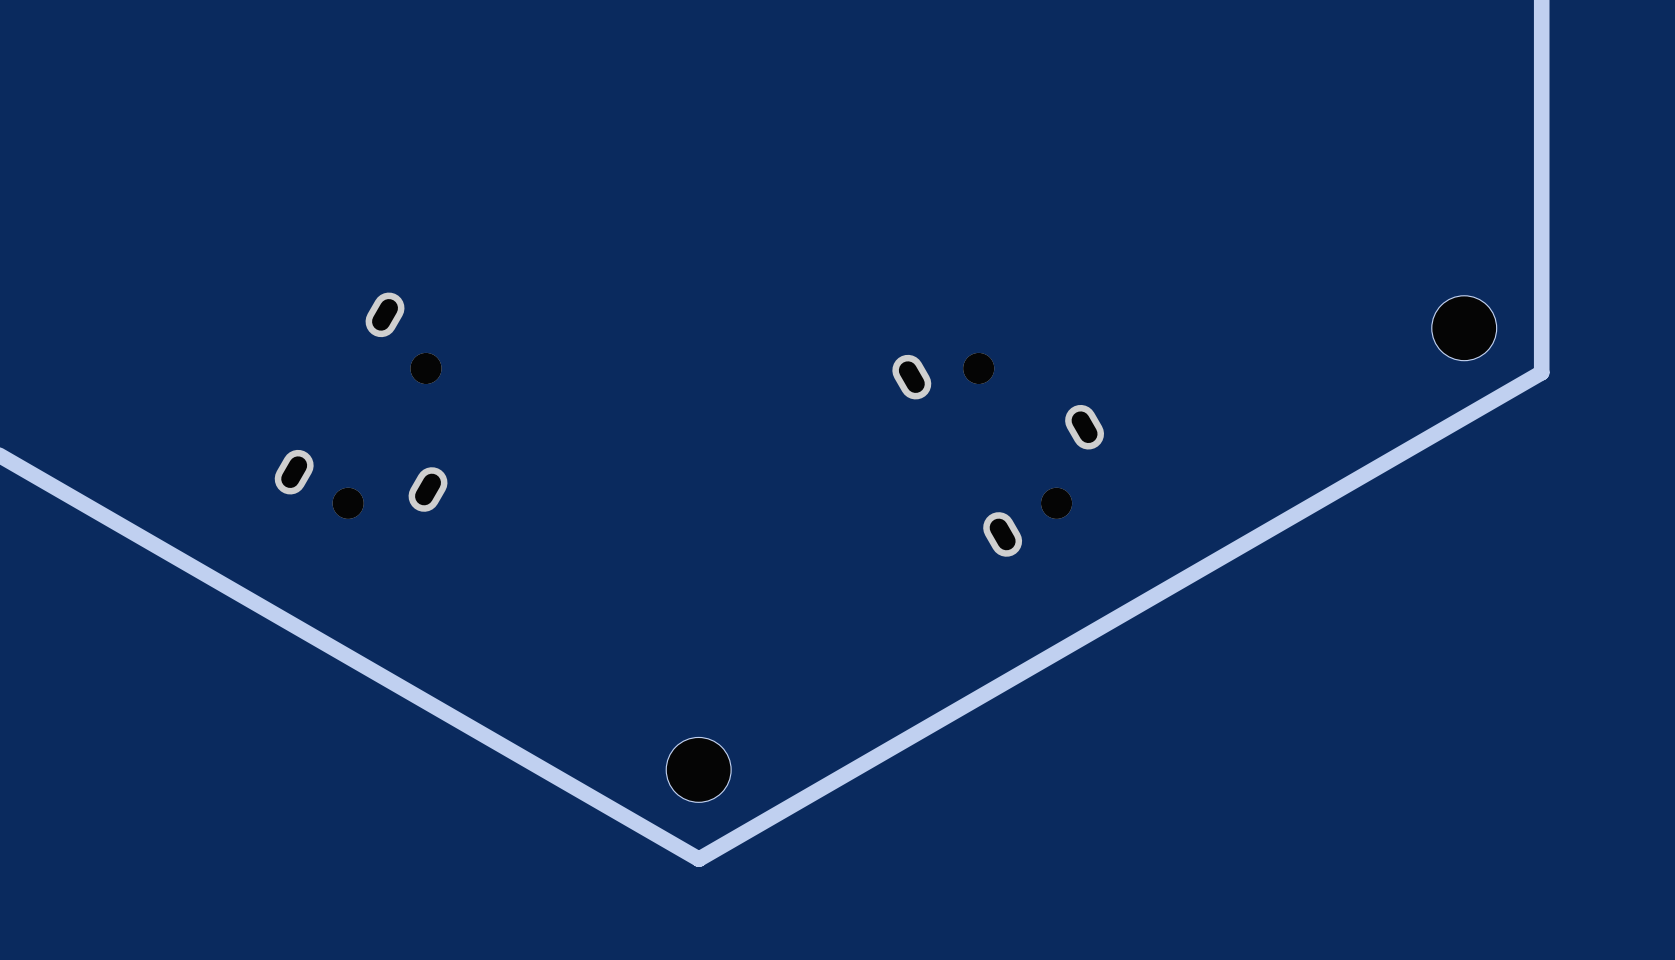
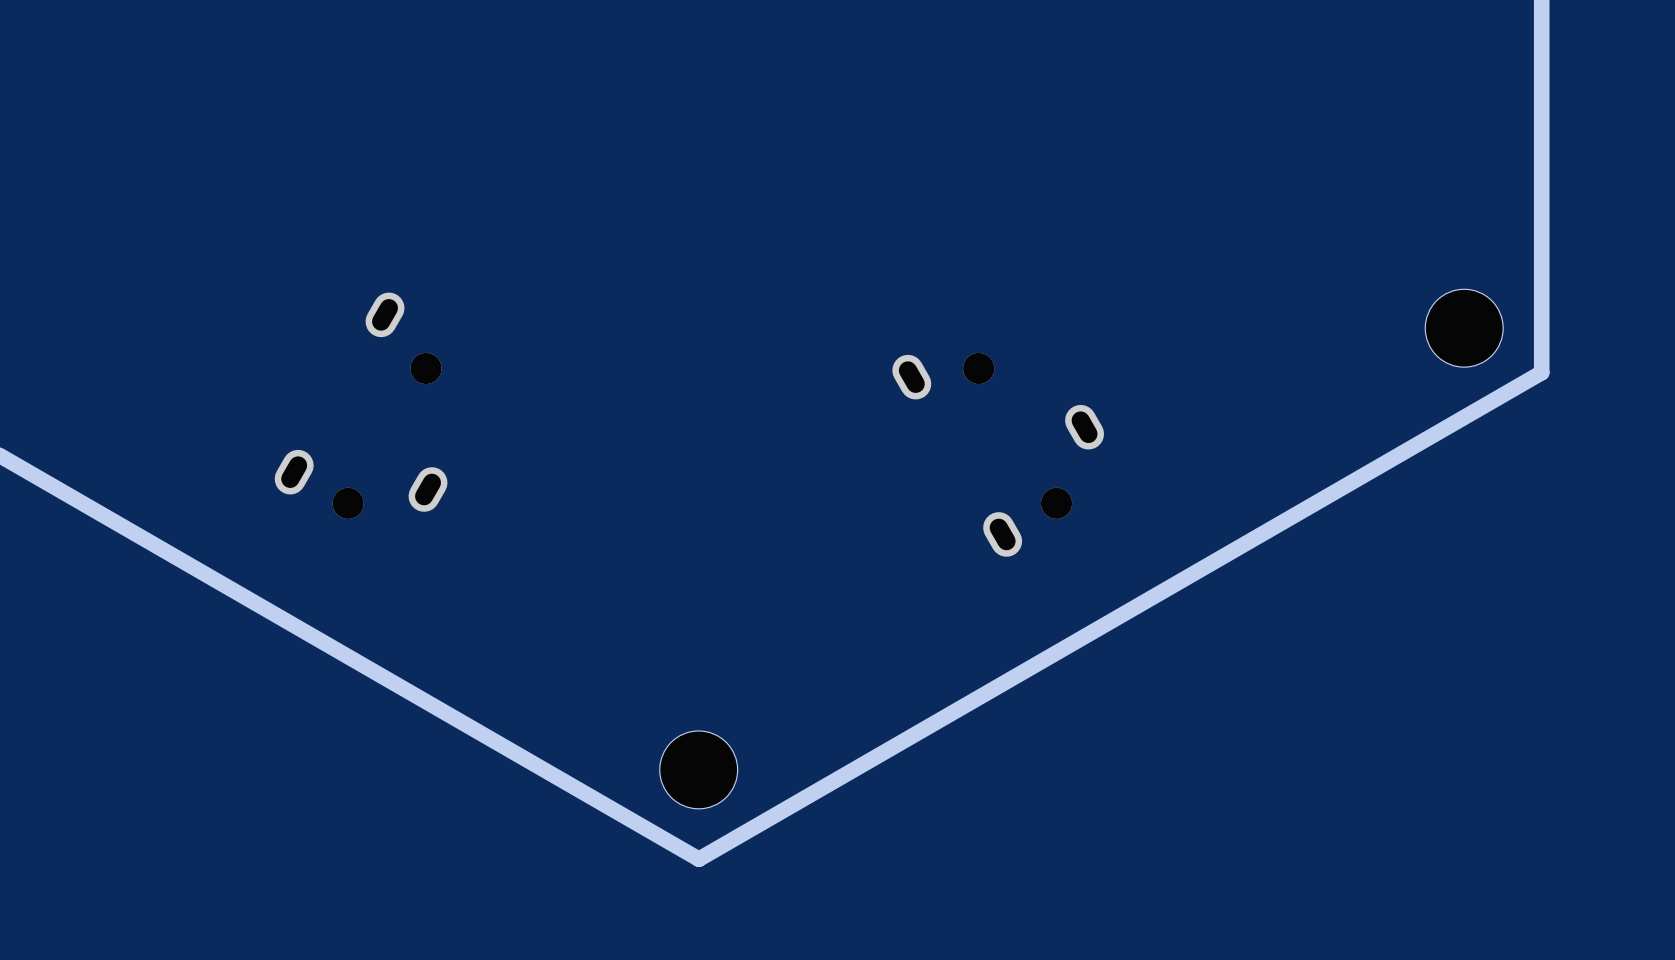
part footprint: [1431, 295, 1497, 361] -> [1425, 289, 1504, 368]
part footprint: [666, 737, 732, 803] -> [659, 730, 738, 809]

